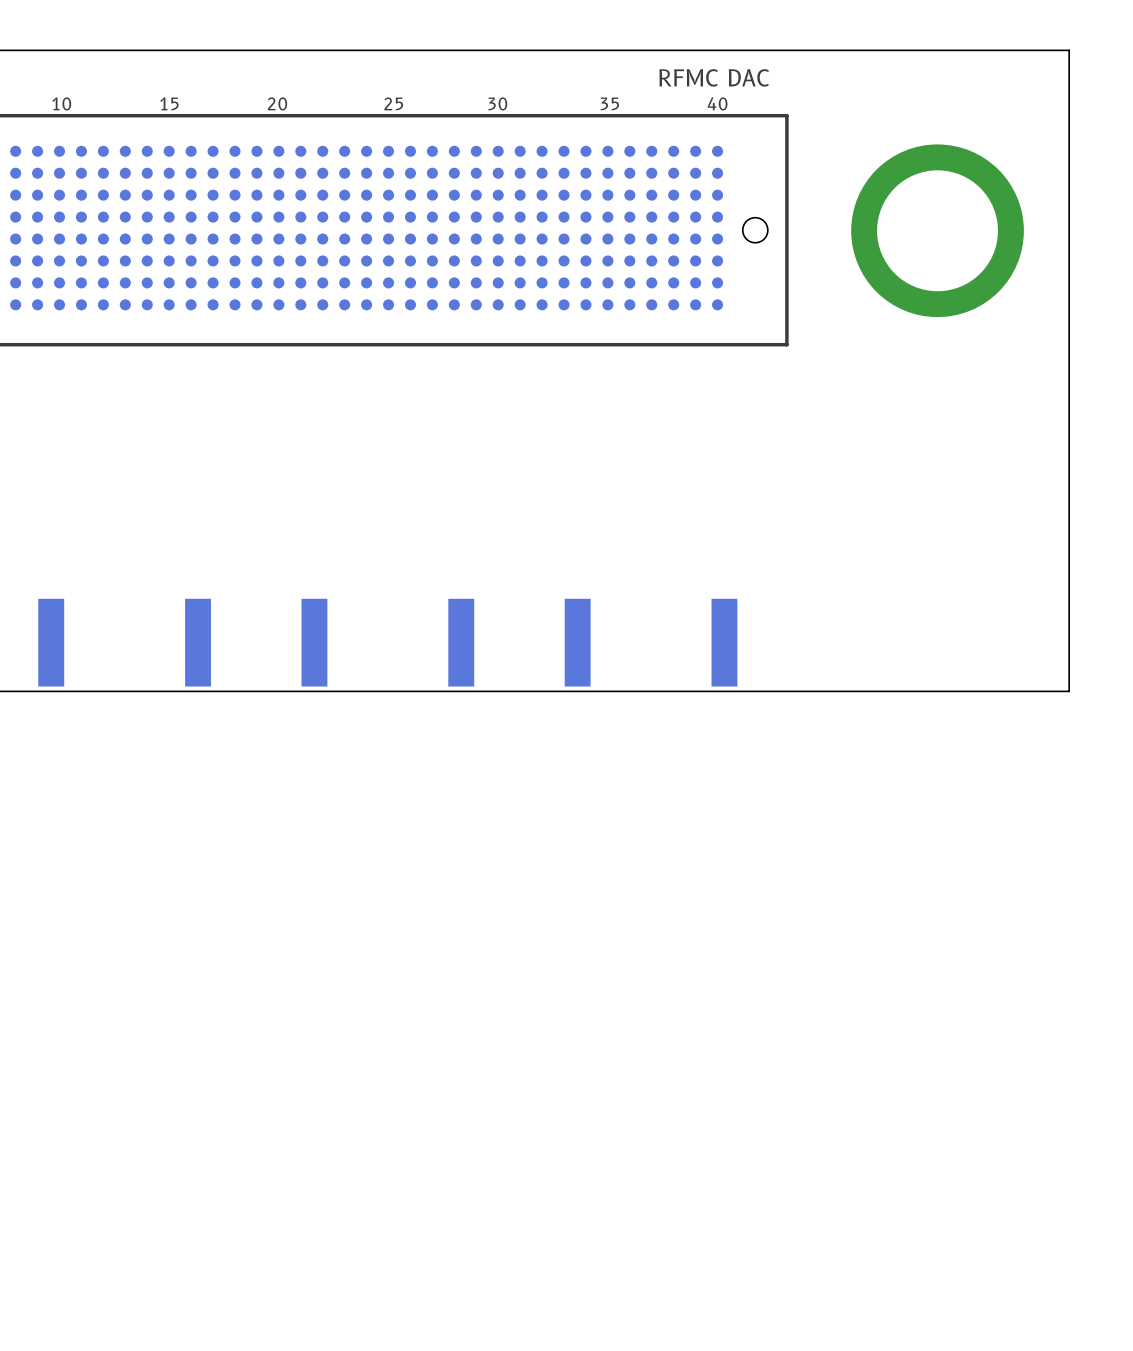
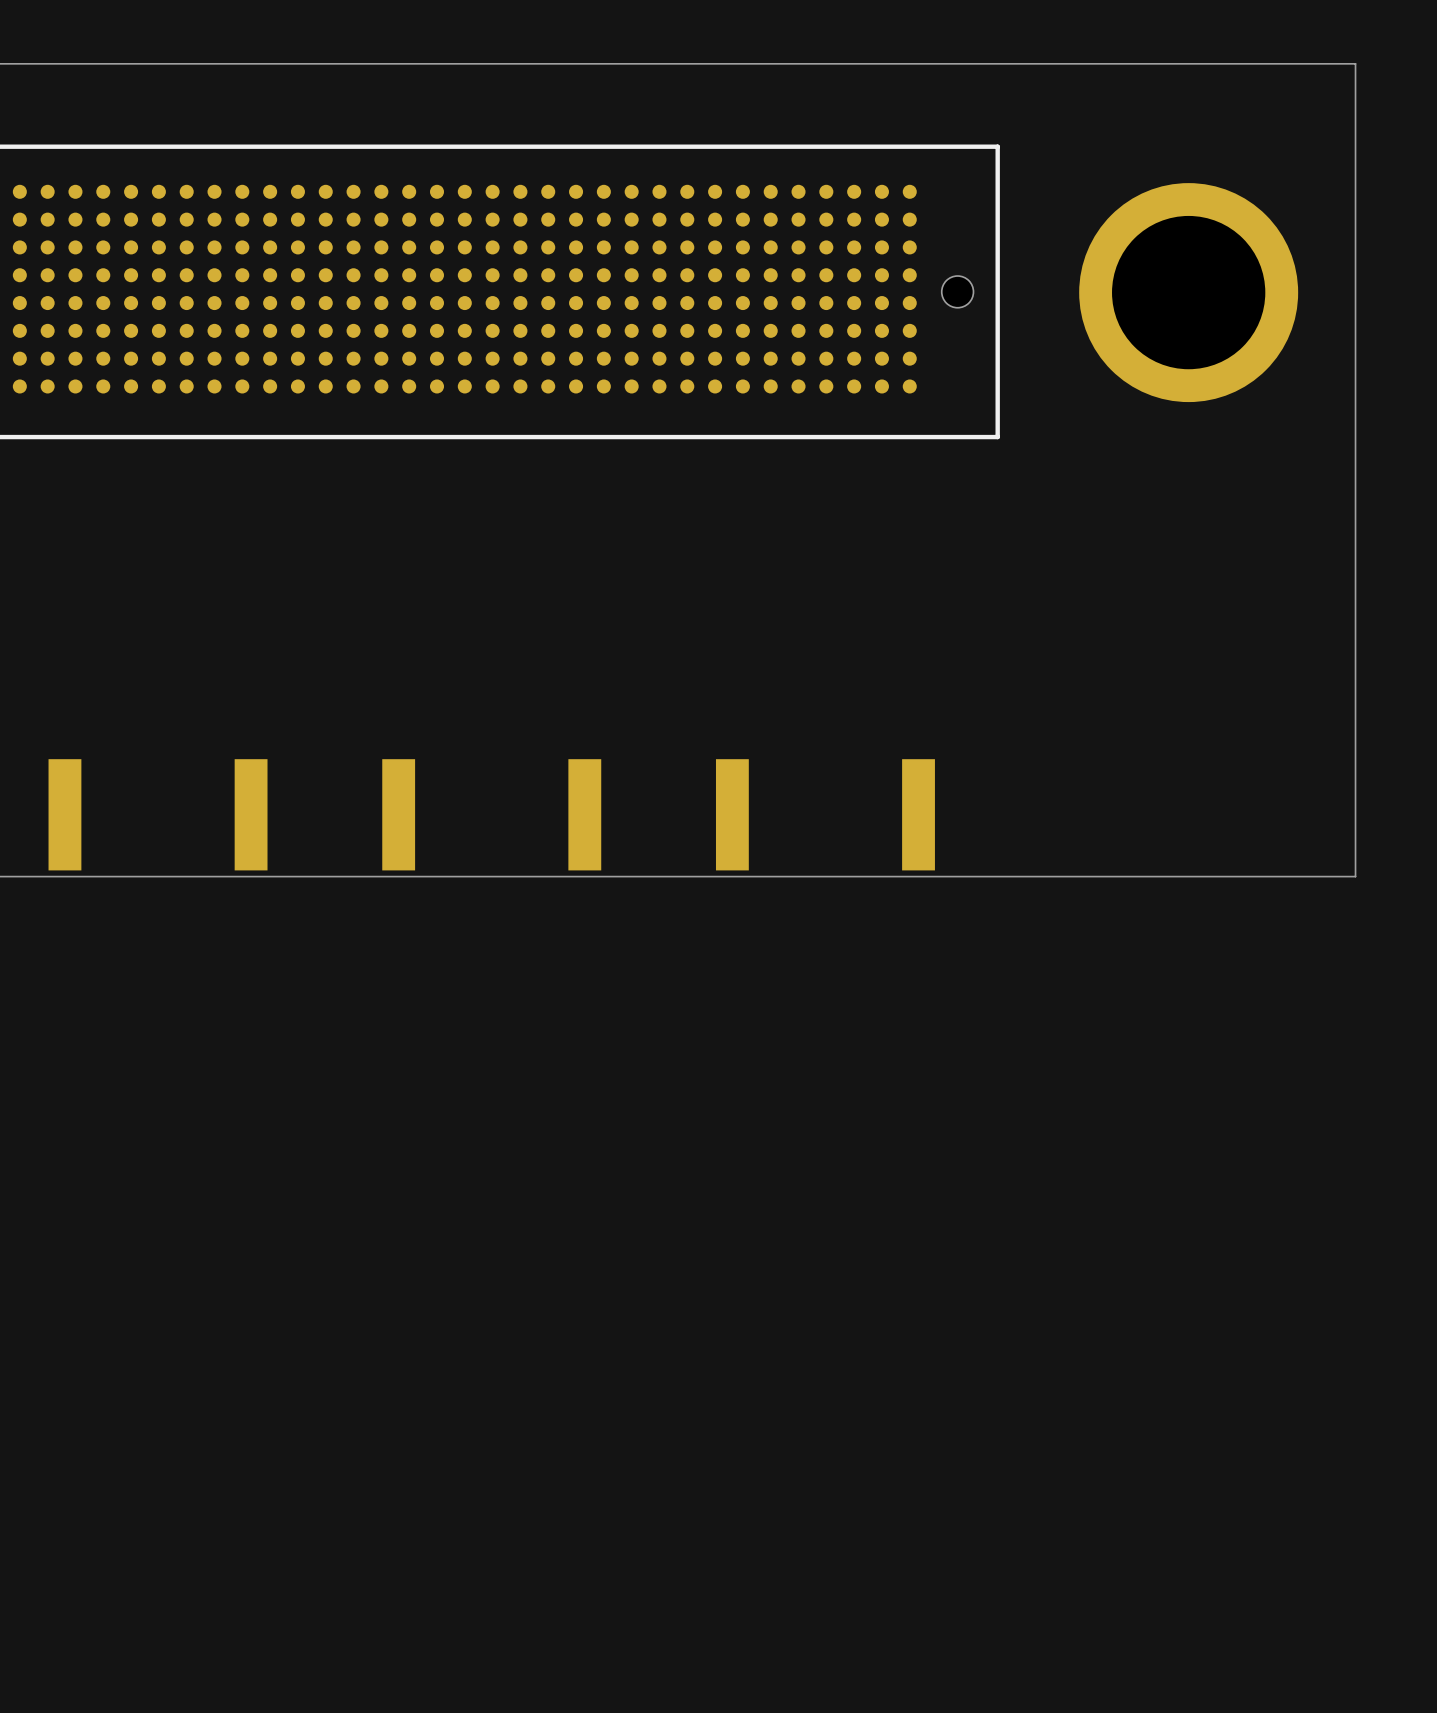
text: RFMC DAC (714, 77) -> none
text: 10 (61, 103) -> none
text: 15 (169, 103) -> none
text: 20 (277, 103) -> none
text: 25 (393, 103) -> none
text: 30 (497, 103) -> none
text: 35 (609, 103) -> none
text: 40 (717, 103) -> none

